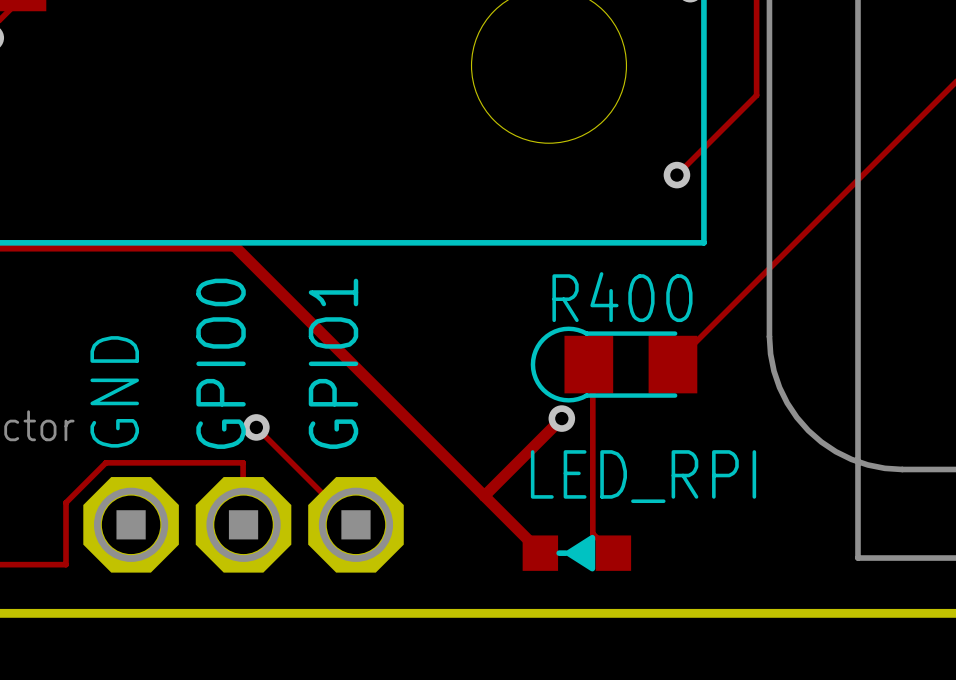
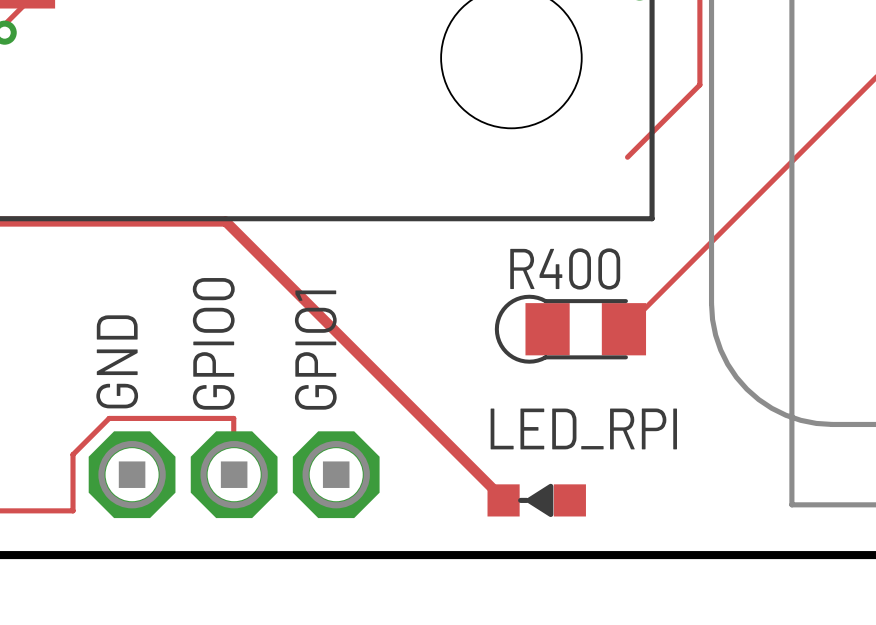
via: (676, 175) -> none
track: (588, 364) (592, 365) (592, 533) (613, 553) -> none
track: (561, 418) (484, 496) -> none
via: (561, 418) -> none
track: (256, 427) (353, 524) (355, 524) -> none
via: (256, 427) -> none

